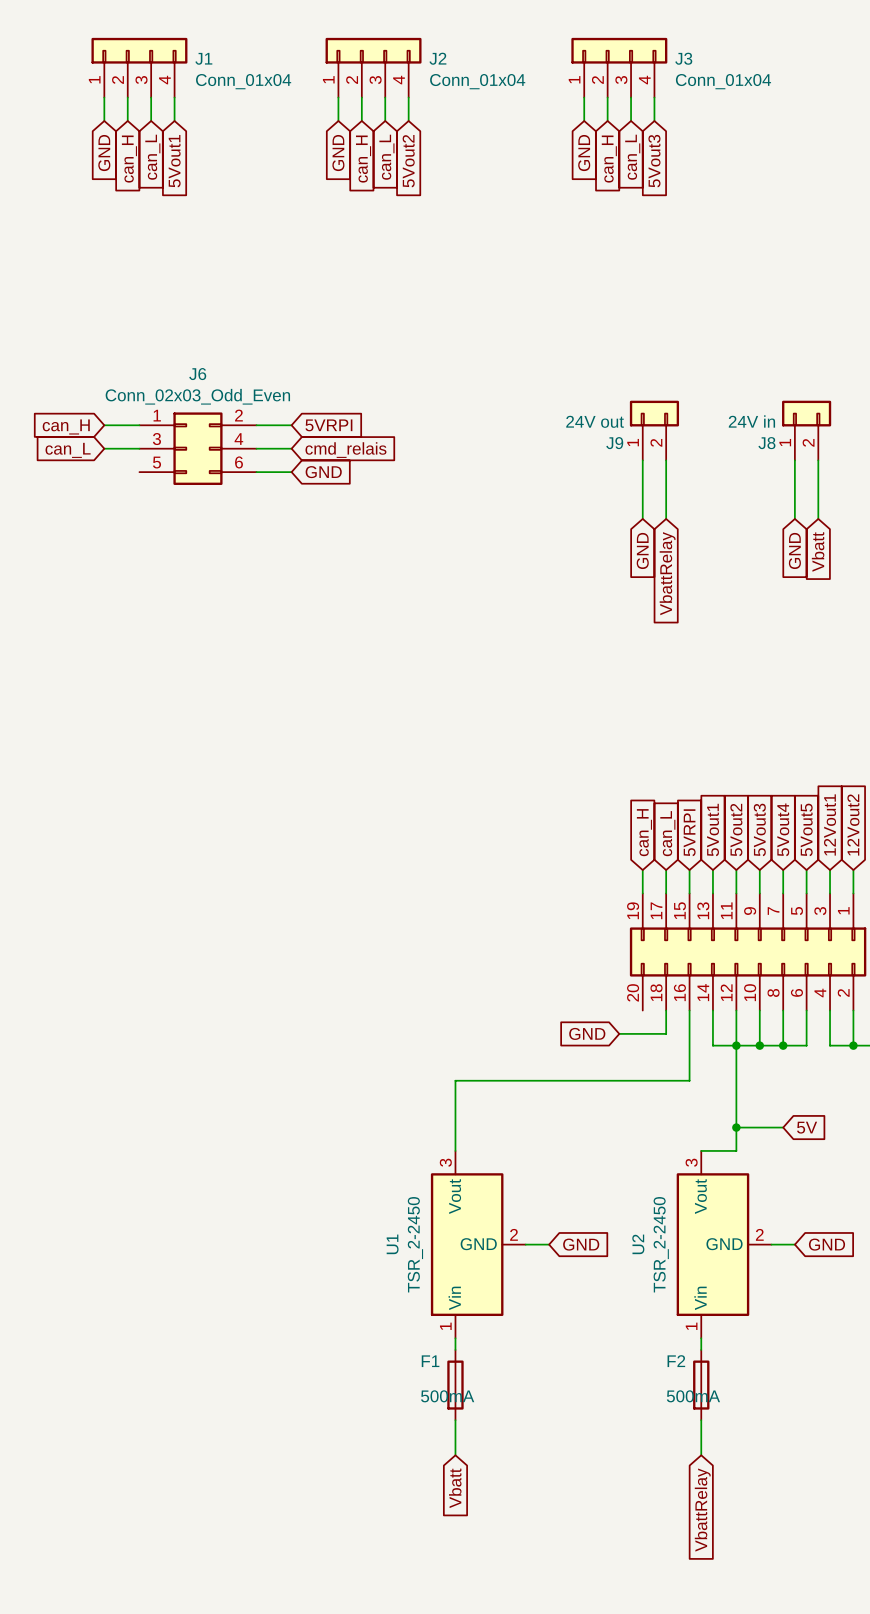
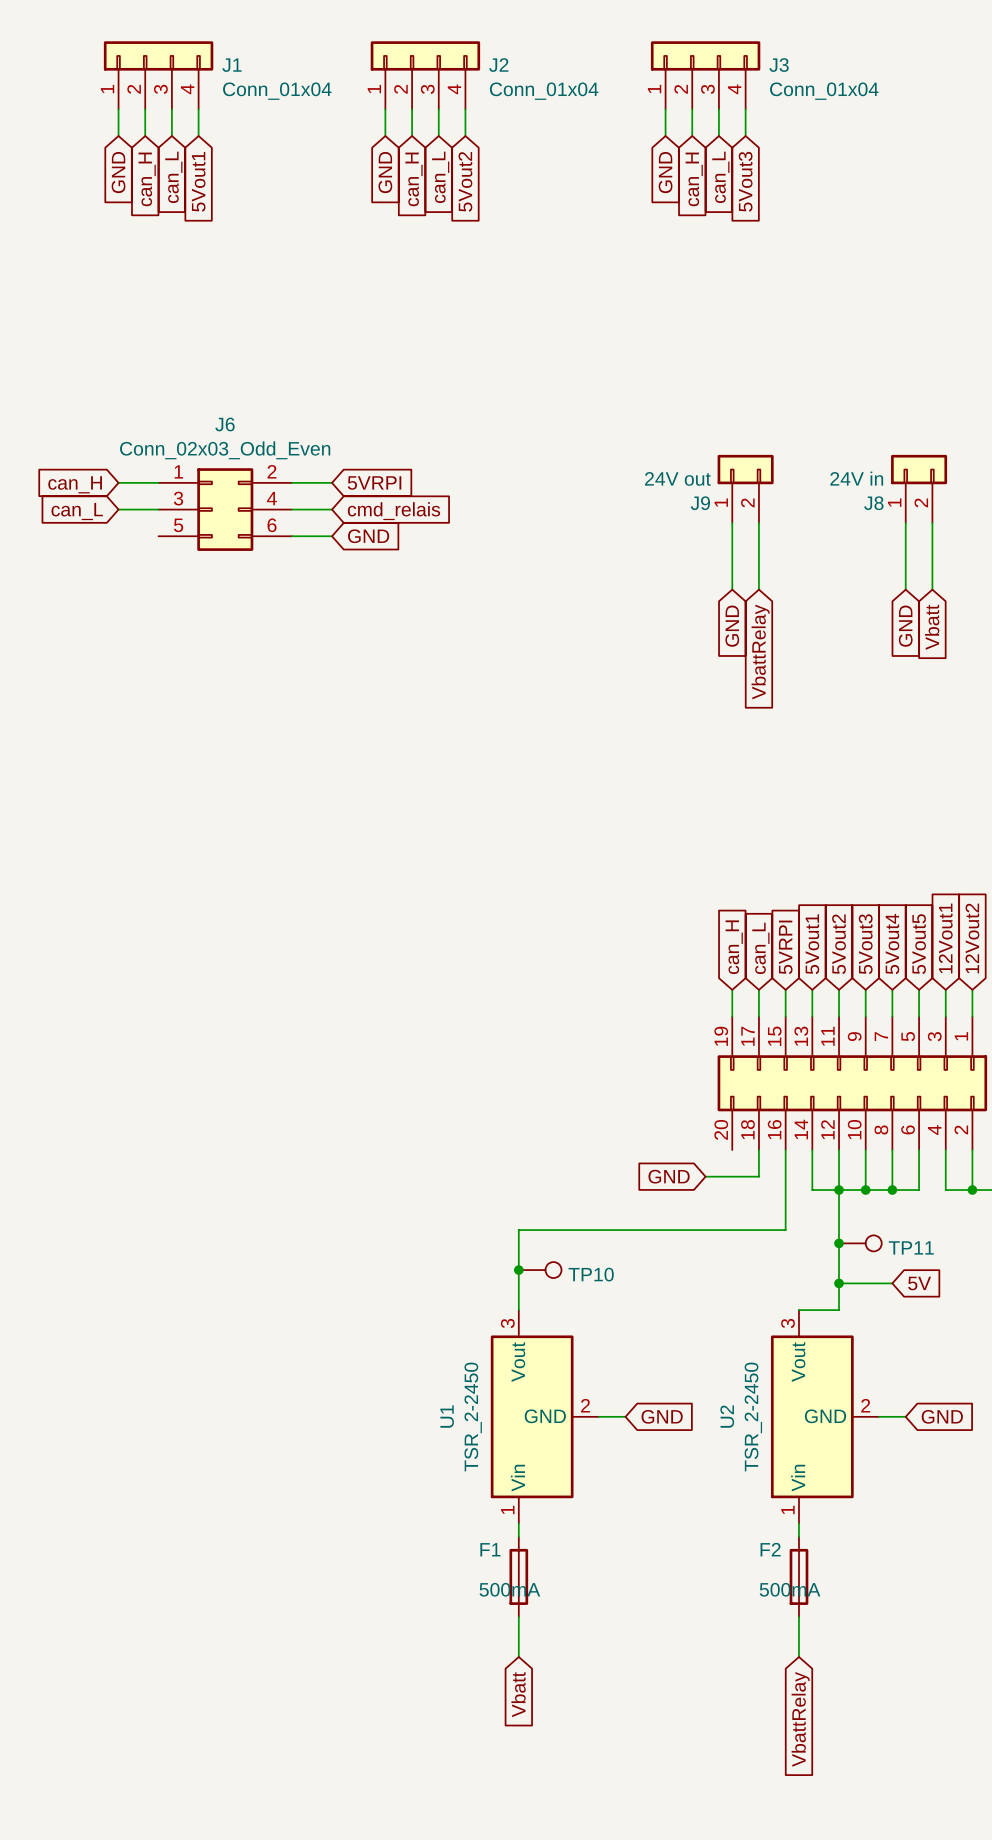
junction: none -> (839, 1243)
TP11: none -> (860, 1243)
junction: none -> (518, 1270)
TP10: none -> (540, 1270)

